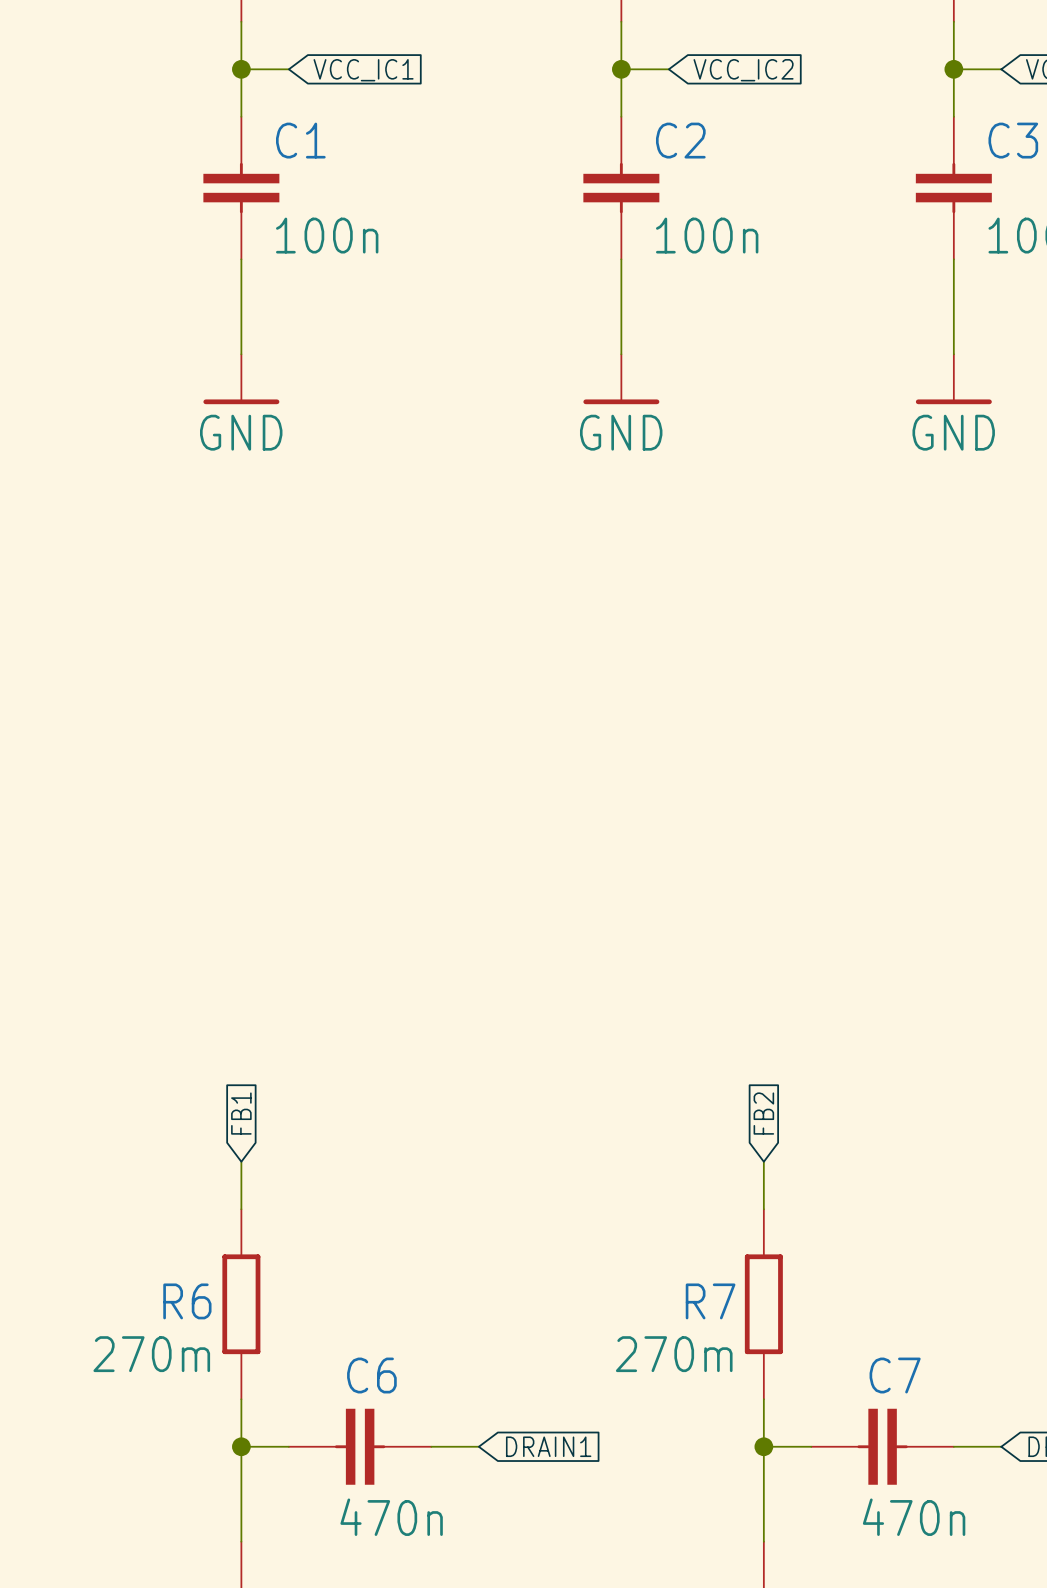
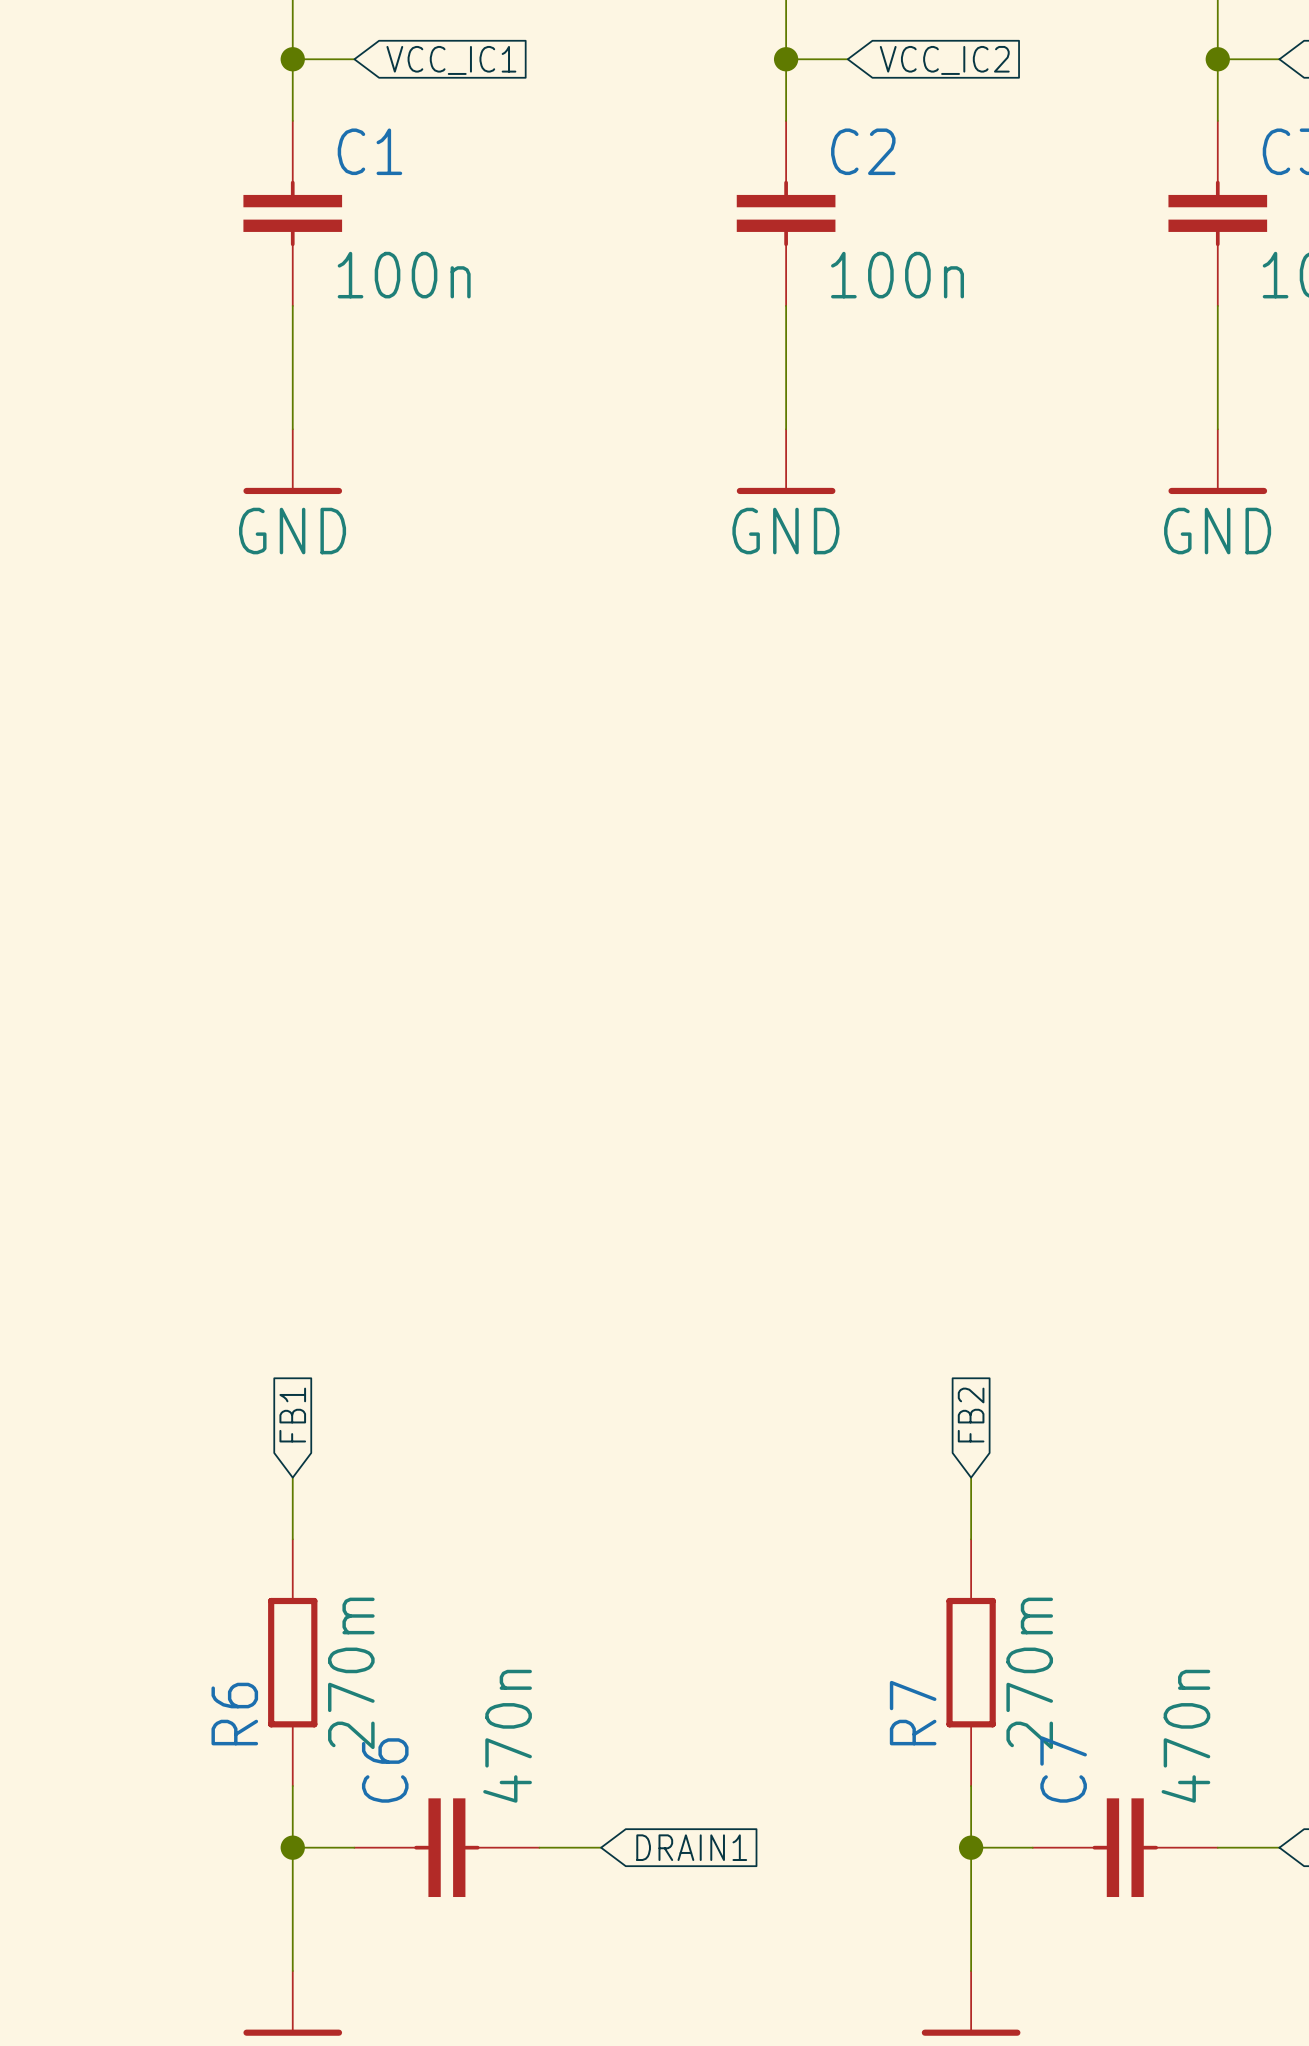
R6 name rotation: 0° (187, 1301) -> 90° counterclockwise (234, 1714)
R7 name rotation: 0° (710, 1301) -> 90° counterclockwise (913, 1713)
R6 value rotation: 0° (151, 1354) -> 90° counterclockwise (351, 1673)
R6 value position: 270m (151, 1354) -> 270m (351, 1673)
R7 value rotation: 0° (674, 1354) -> 90° counterclockwise (1029, 1673)
R7 value position: 270m (674, 1354) -> 270m (1029, 1673)
C6 name rotation: 0° (371, 1375) -> 90° counterclockwise (385, 1770)
C7 name rotation: 0° (895, 1375) -> 90° counterclockwise (1063, 1769)
C6 value rotation: 0° (391, 1517) -> 90° counterclockwise (507, 1736)
C6 value position: 470n (391, 1517) -> 470n (507, 1736)
C7 value rotation: 0° (914, 1517) -> 90° counterclockwise (1185, 1736)
C7 value position: 470n (914, 1517) -> 470n (1185, 1736)

